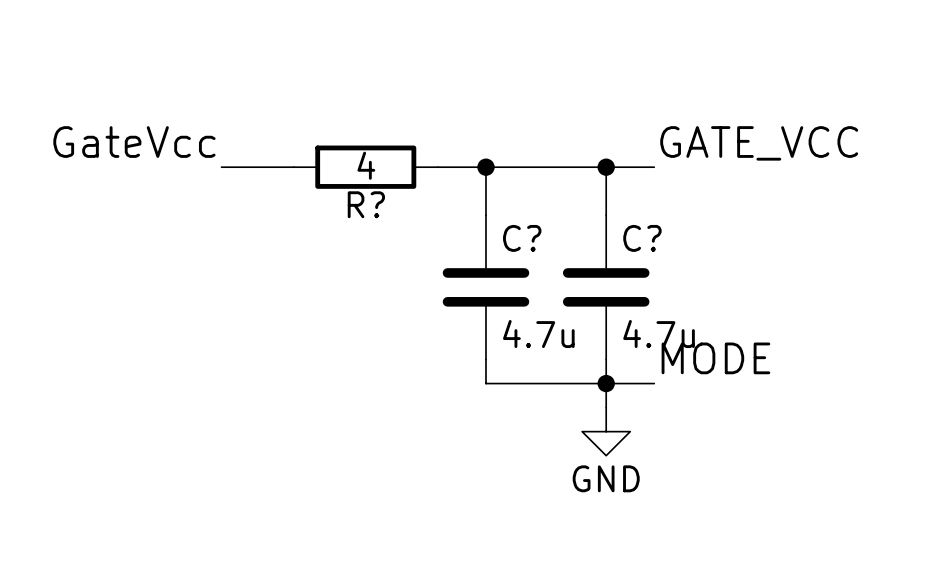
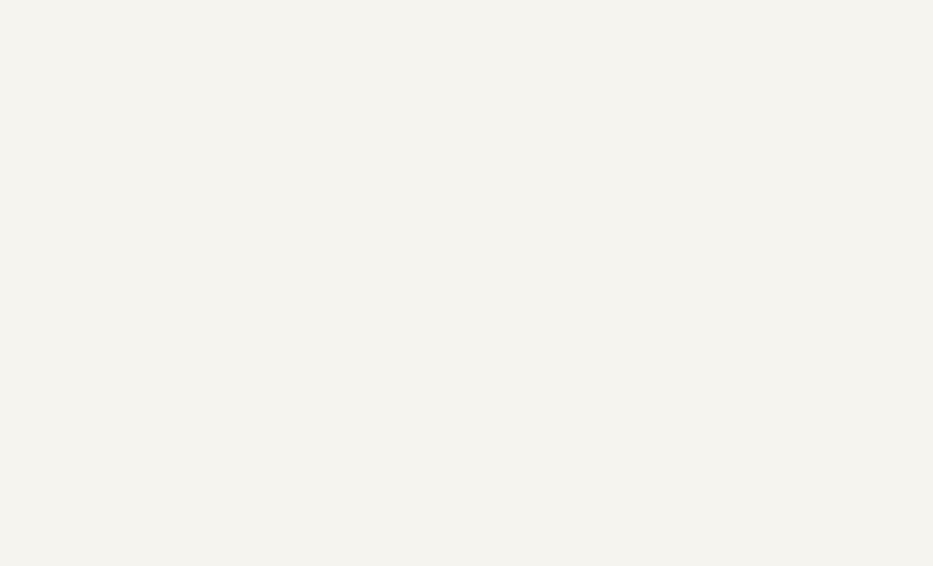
label: GateVcc (134, 142) -> none
label: GATE_VCC (759, 143) -> none
wire: (221, 167) (293, 167) -> none
R?: 4 (365, 167) -> none
wire: (437, 167) (654, 167) -> none
wire: (485, 167) (485, 215) -> none
junction: (485, 167) -> none
wire: (606, 167) (606, 215) -> none
junction: (606, 167) -> none
C?: 4.7u (485, 287) -> none
C?: 4.7u (606, 287) -> none
label: MODE (715, 358) -> none
wire: (485, 359) (485, 383) (654, 383) -> none
wire: (606, 359) (606, 407) -> none
junction: (606, 383) -> none
power symbol: GND (606, 431) -> none

